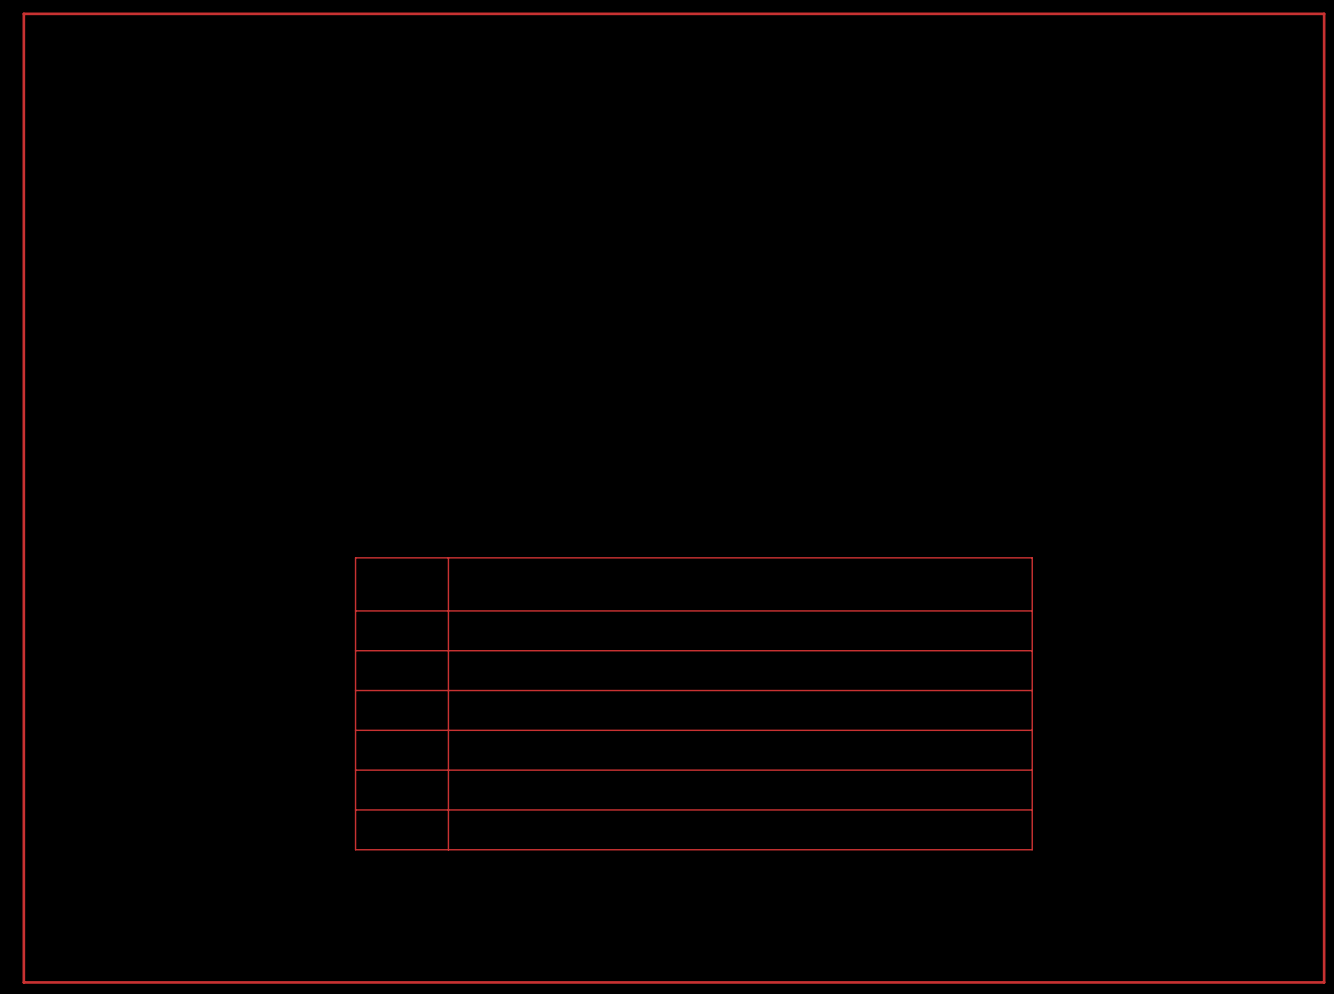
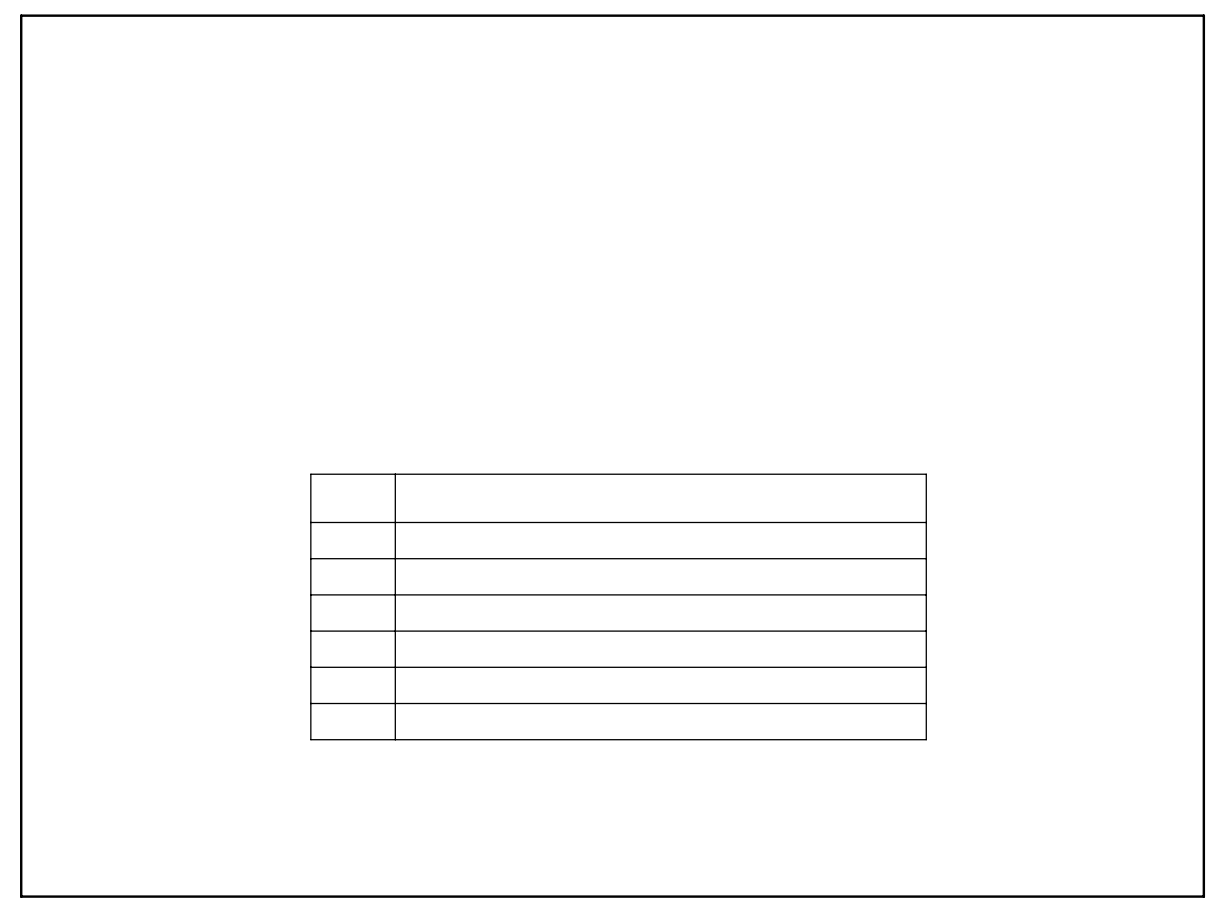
line: (355, 557) (1032, 557) (1032, 849) (355, 849) (355, 557) -> none
line: (448, 557) (448, 849) -> (395, 474) (395, 739)
line: none -> (310, 522) (926, 522)
line: none -> (310, 558) (322, 558)
line: (1018, 610) (1032, 610) -> none
line: none -> (310, 594) (322, 594)
line: (1018, 650) (1032, 650) -> none
line: none -> (310, 631) (322, 631)
line: (1018, 690) (1032, 690) -> none
line: none -> (310, 667) (322, 667)
line: (1018, 730) (1032, 730) -> none
line: none -> (310, 703) (322, 703)
line: (1018, 770) (1032, 770) -> none
line: (1018, 809) (1032, 809) -> (926, 739) (926, 474) (310, 474) (310, 739) (322, 739)

